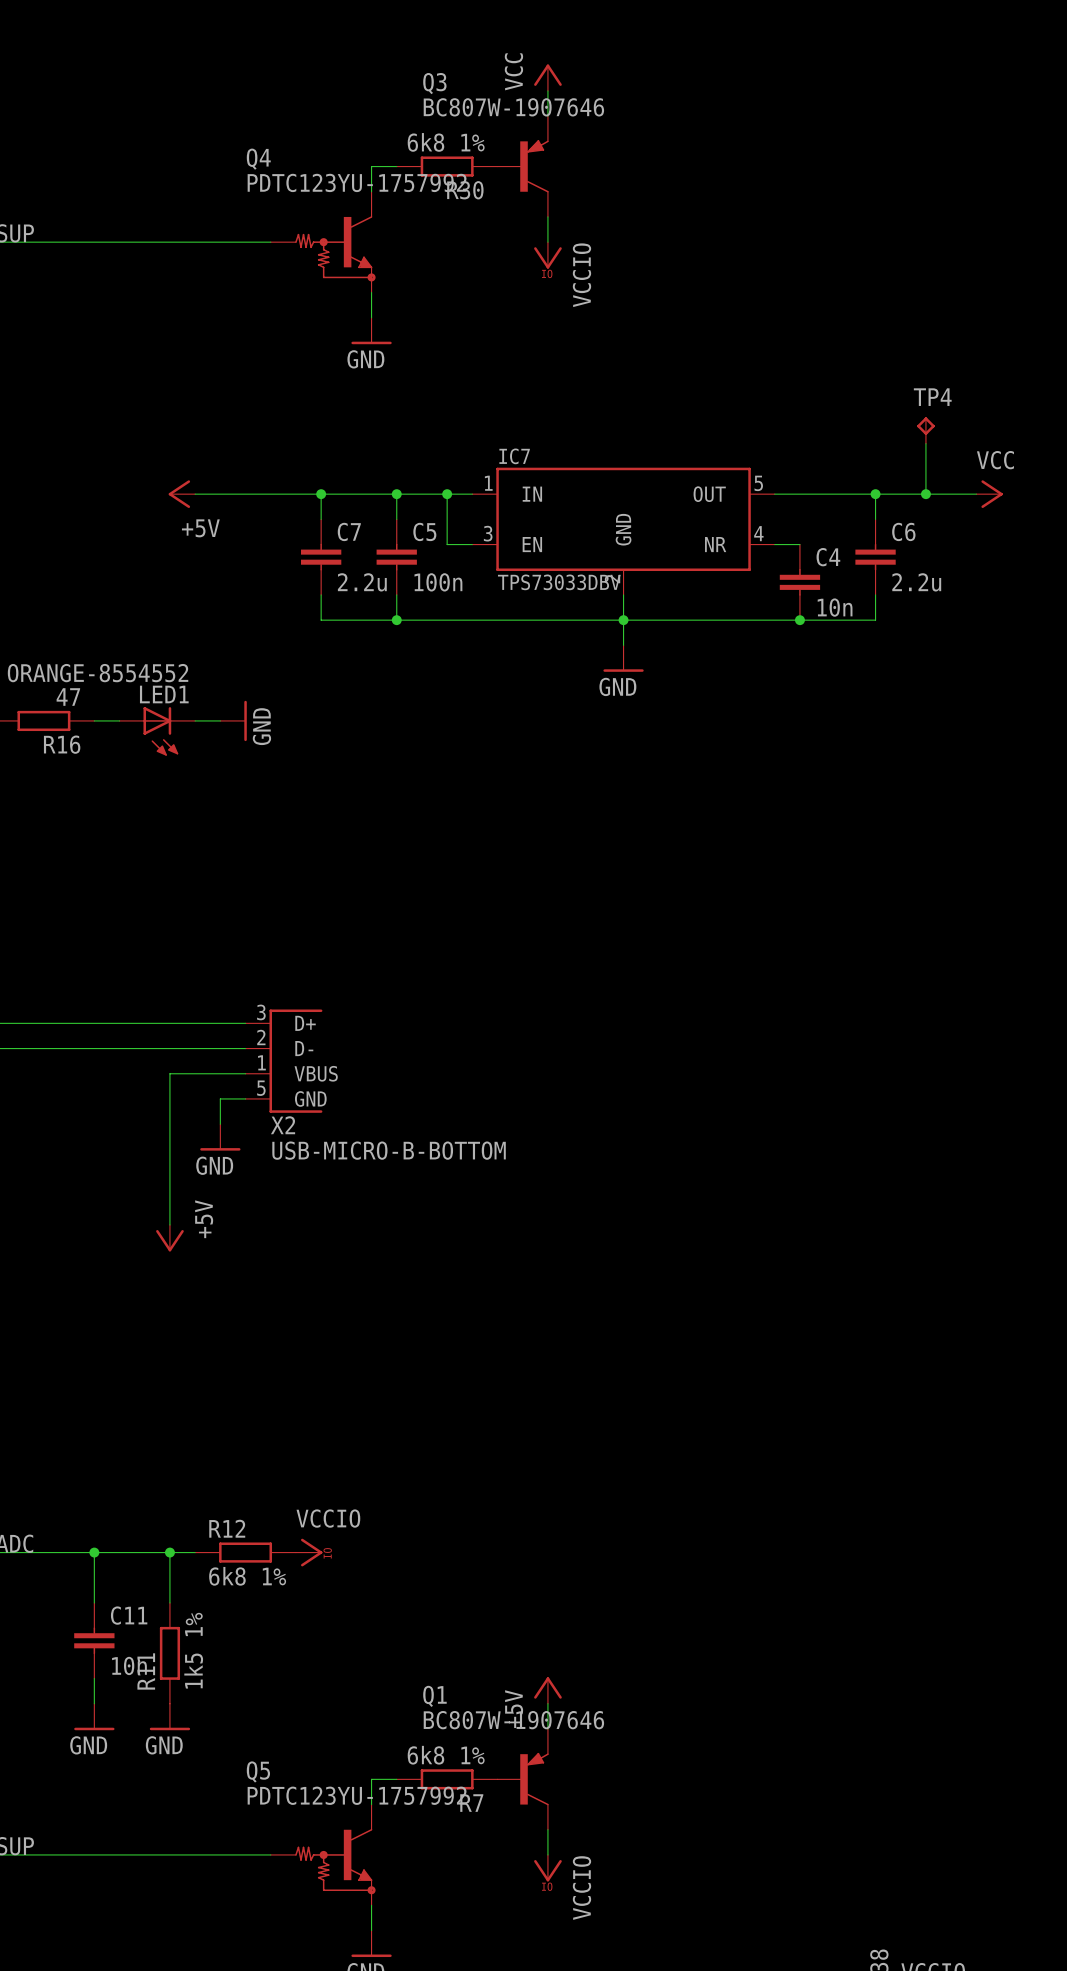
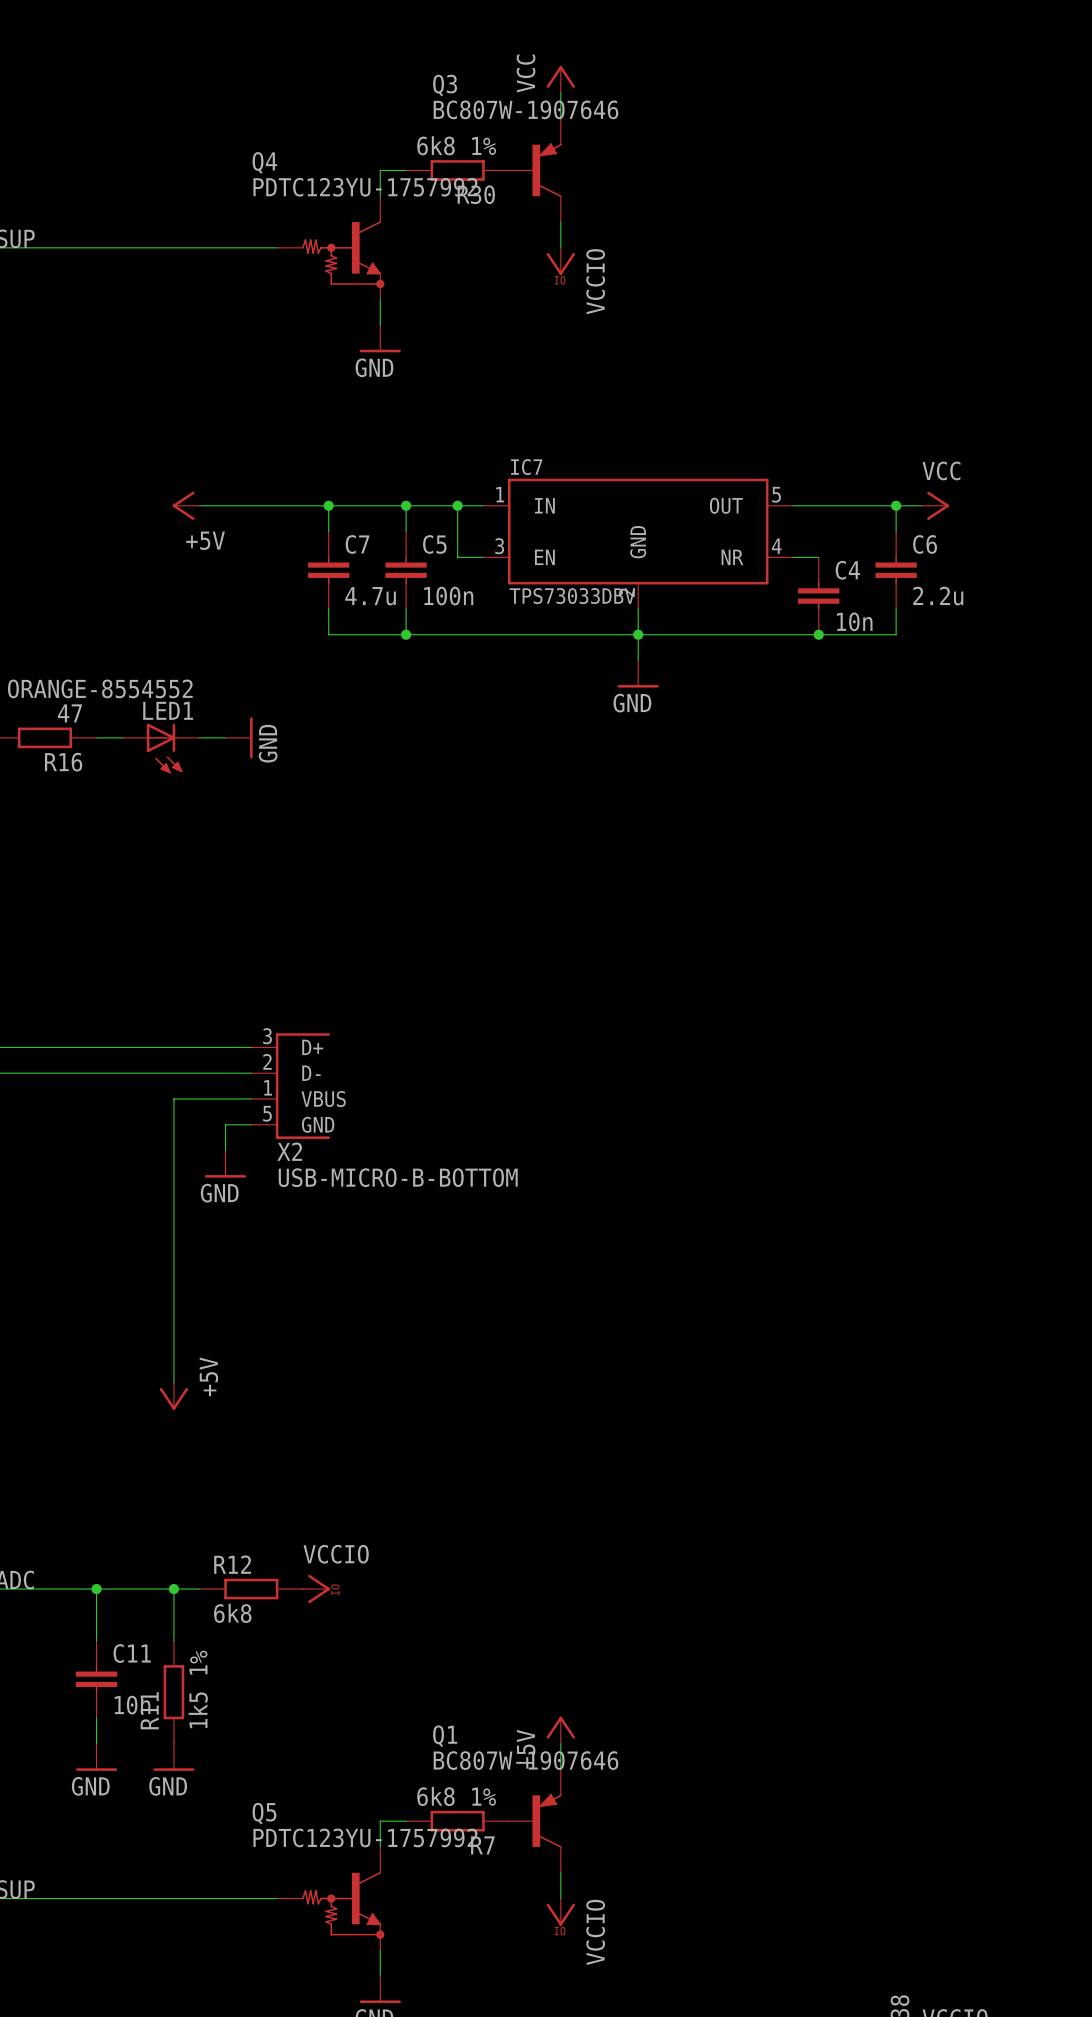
TP4: (925, 430) -> none
wire: (925, 443) (925, 494) -> none
wire: (900, 494) (976, 494) -> none
junction: (925, 494) -> none
power symbol position: VCC (989, 494) -> VCC (935, 505)
C7 value: 2.2u (362, 582) -> 4.7u (370, 596)
wire: none -> (173, 1253) (173, 1382)
power symbol position: +5V (169, 1238) -> +5V (173, 1396)
R12 value: 6k8 1% (247, 1576) -> 6k8 (232, 1613)

